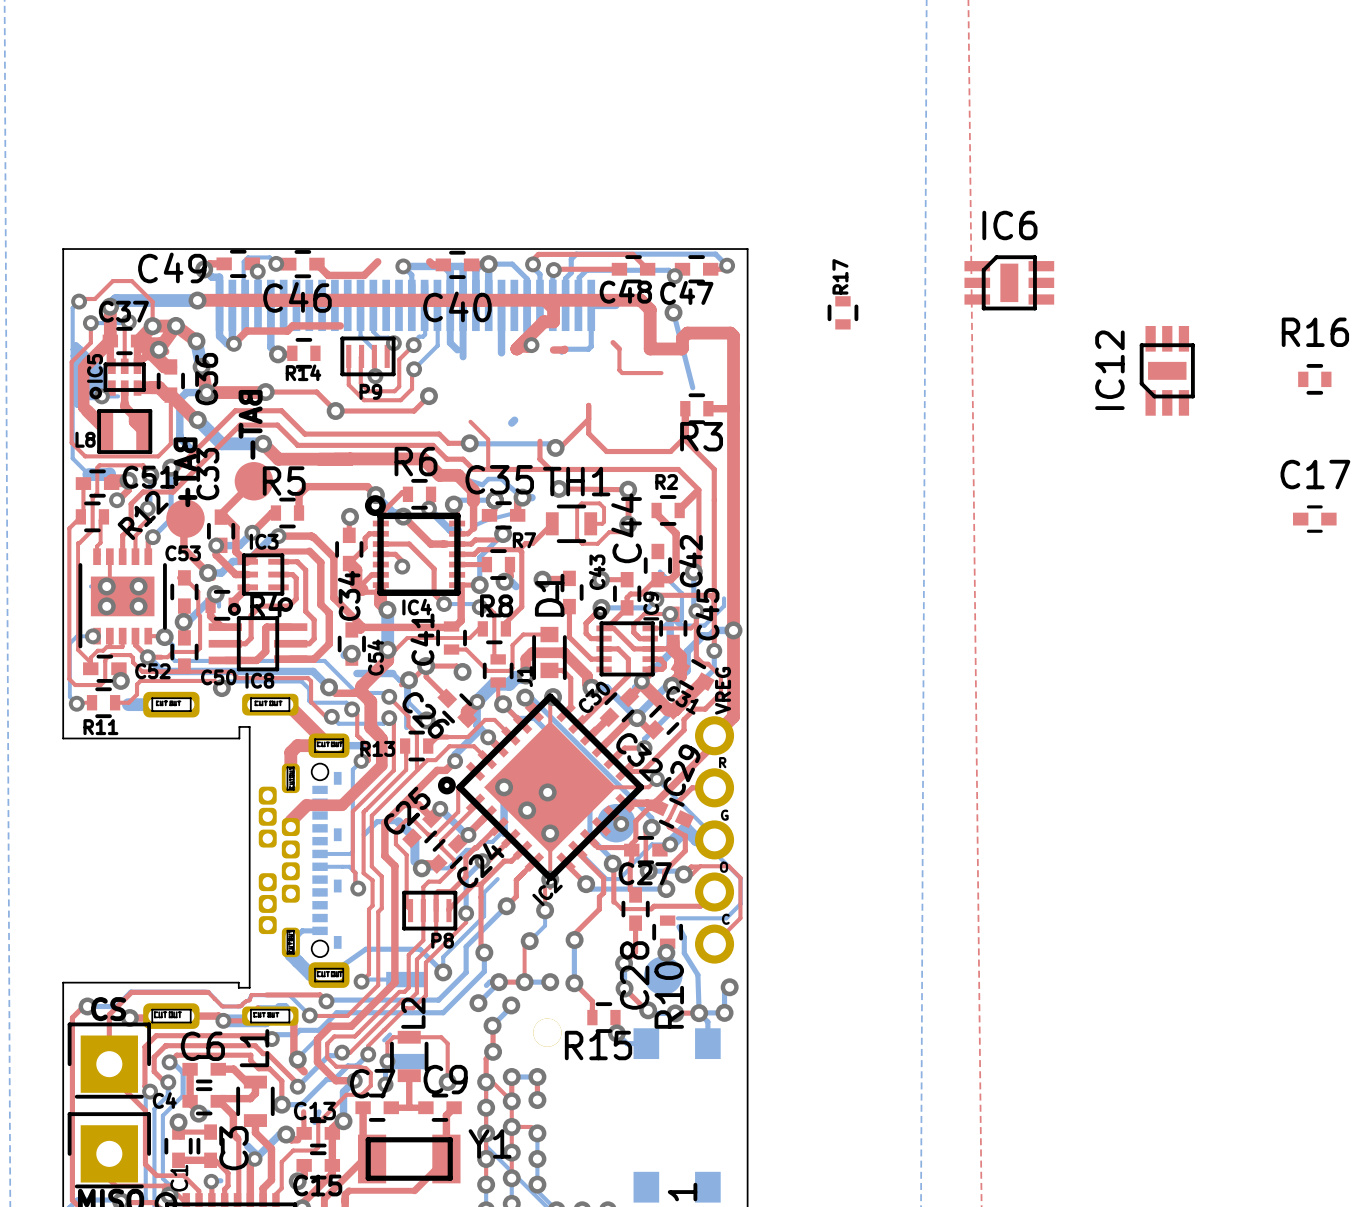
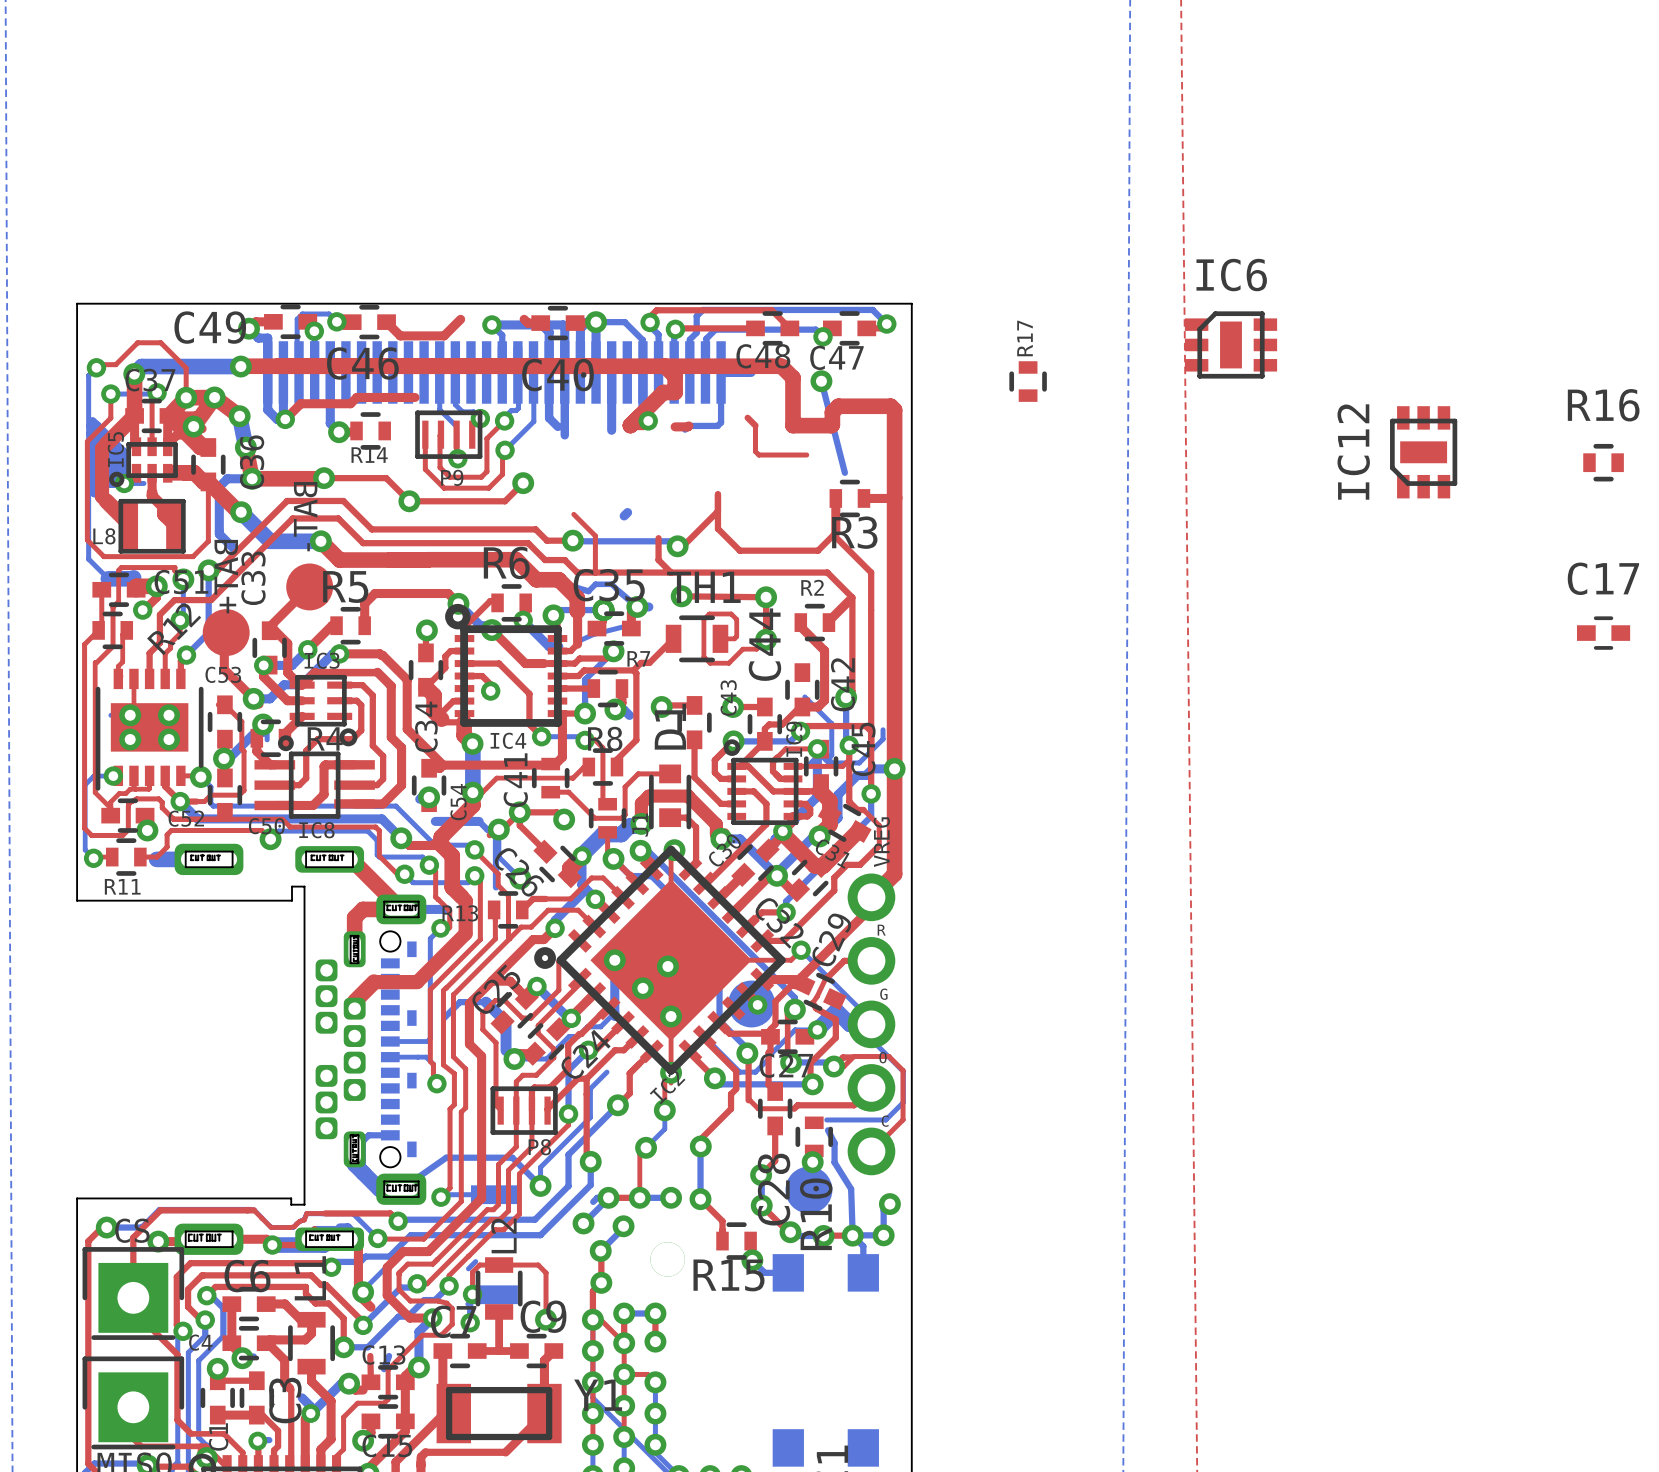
IC6 footprint: [964, 255, 1055, 311] -> [1184, 311, 1278, 379]
IC12 footprint: [1139, 325, 1195, 416] -> [1390, 406, 1458, 499]

